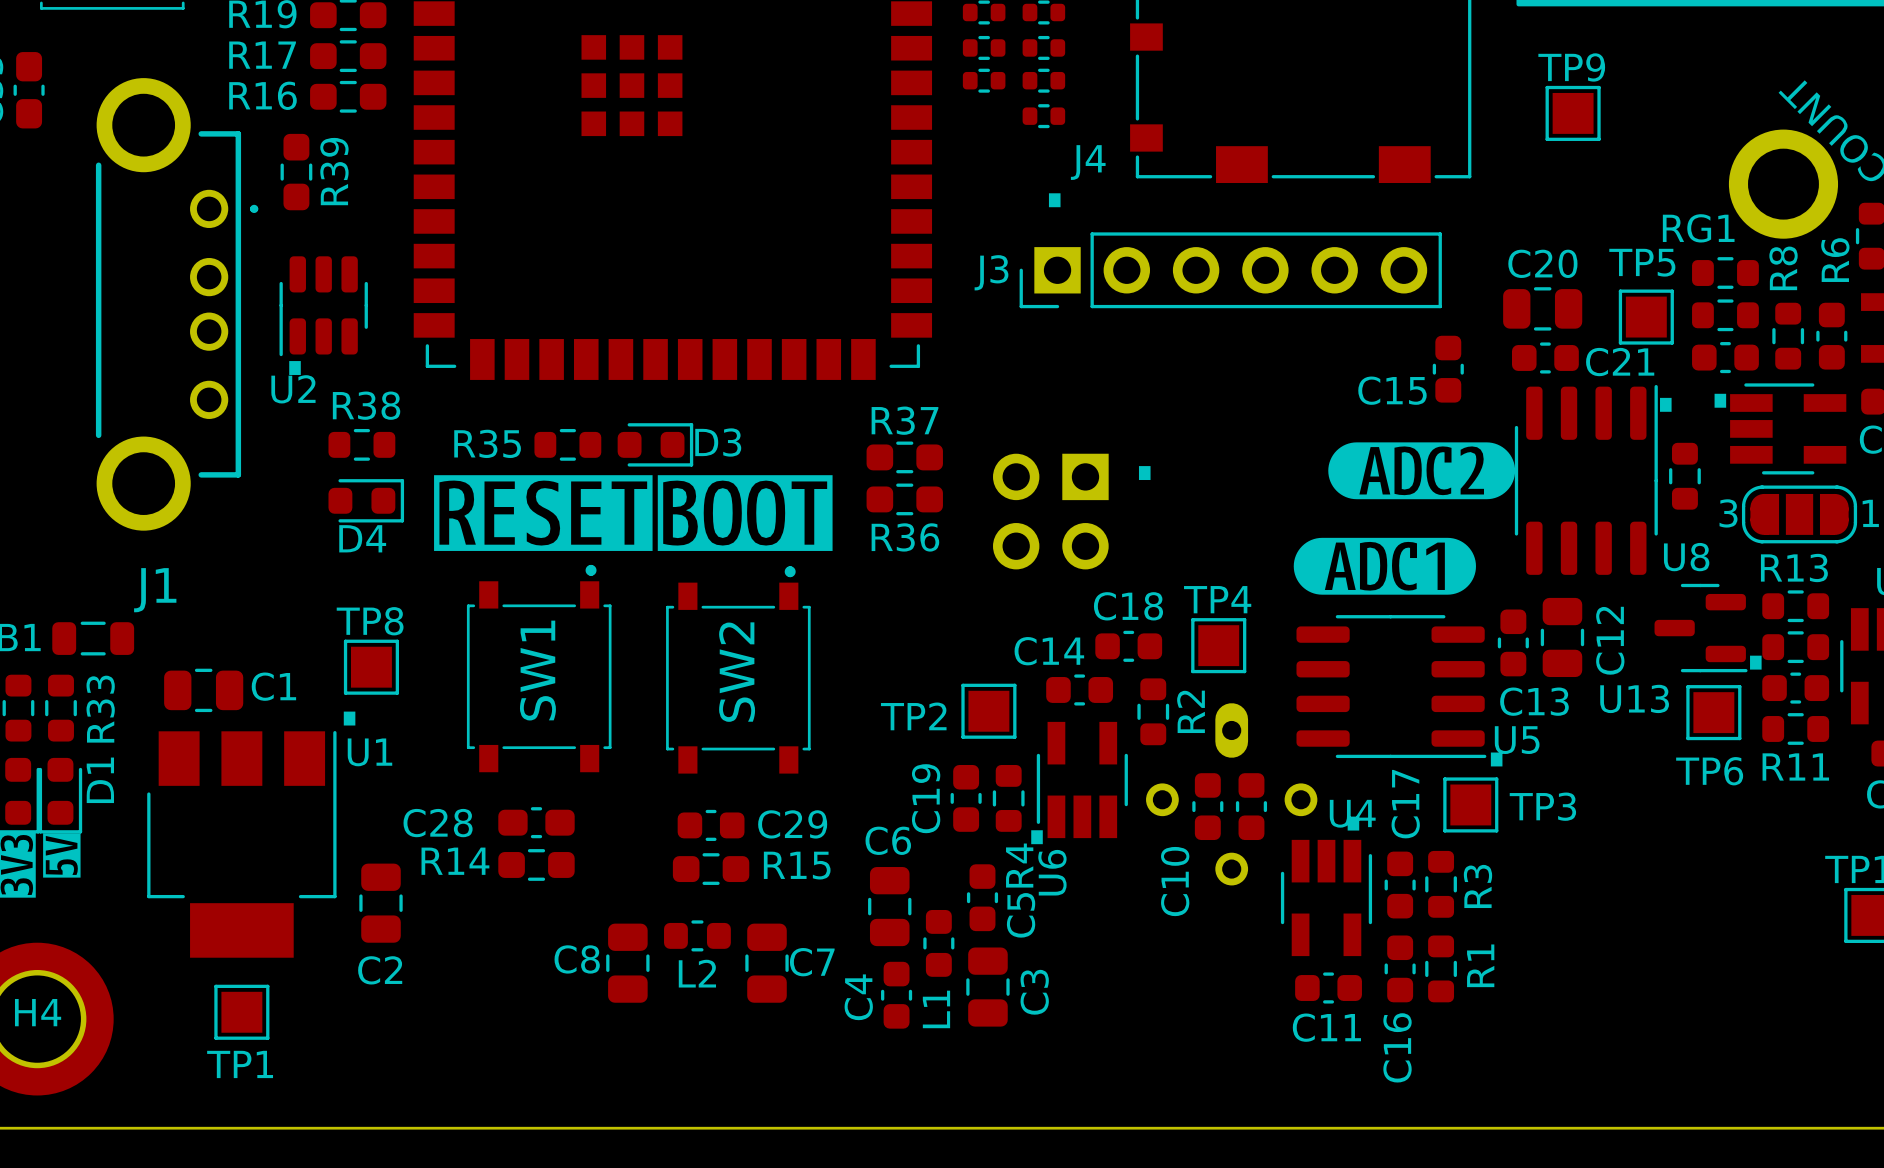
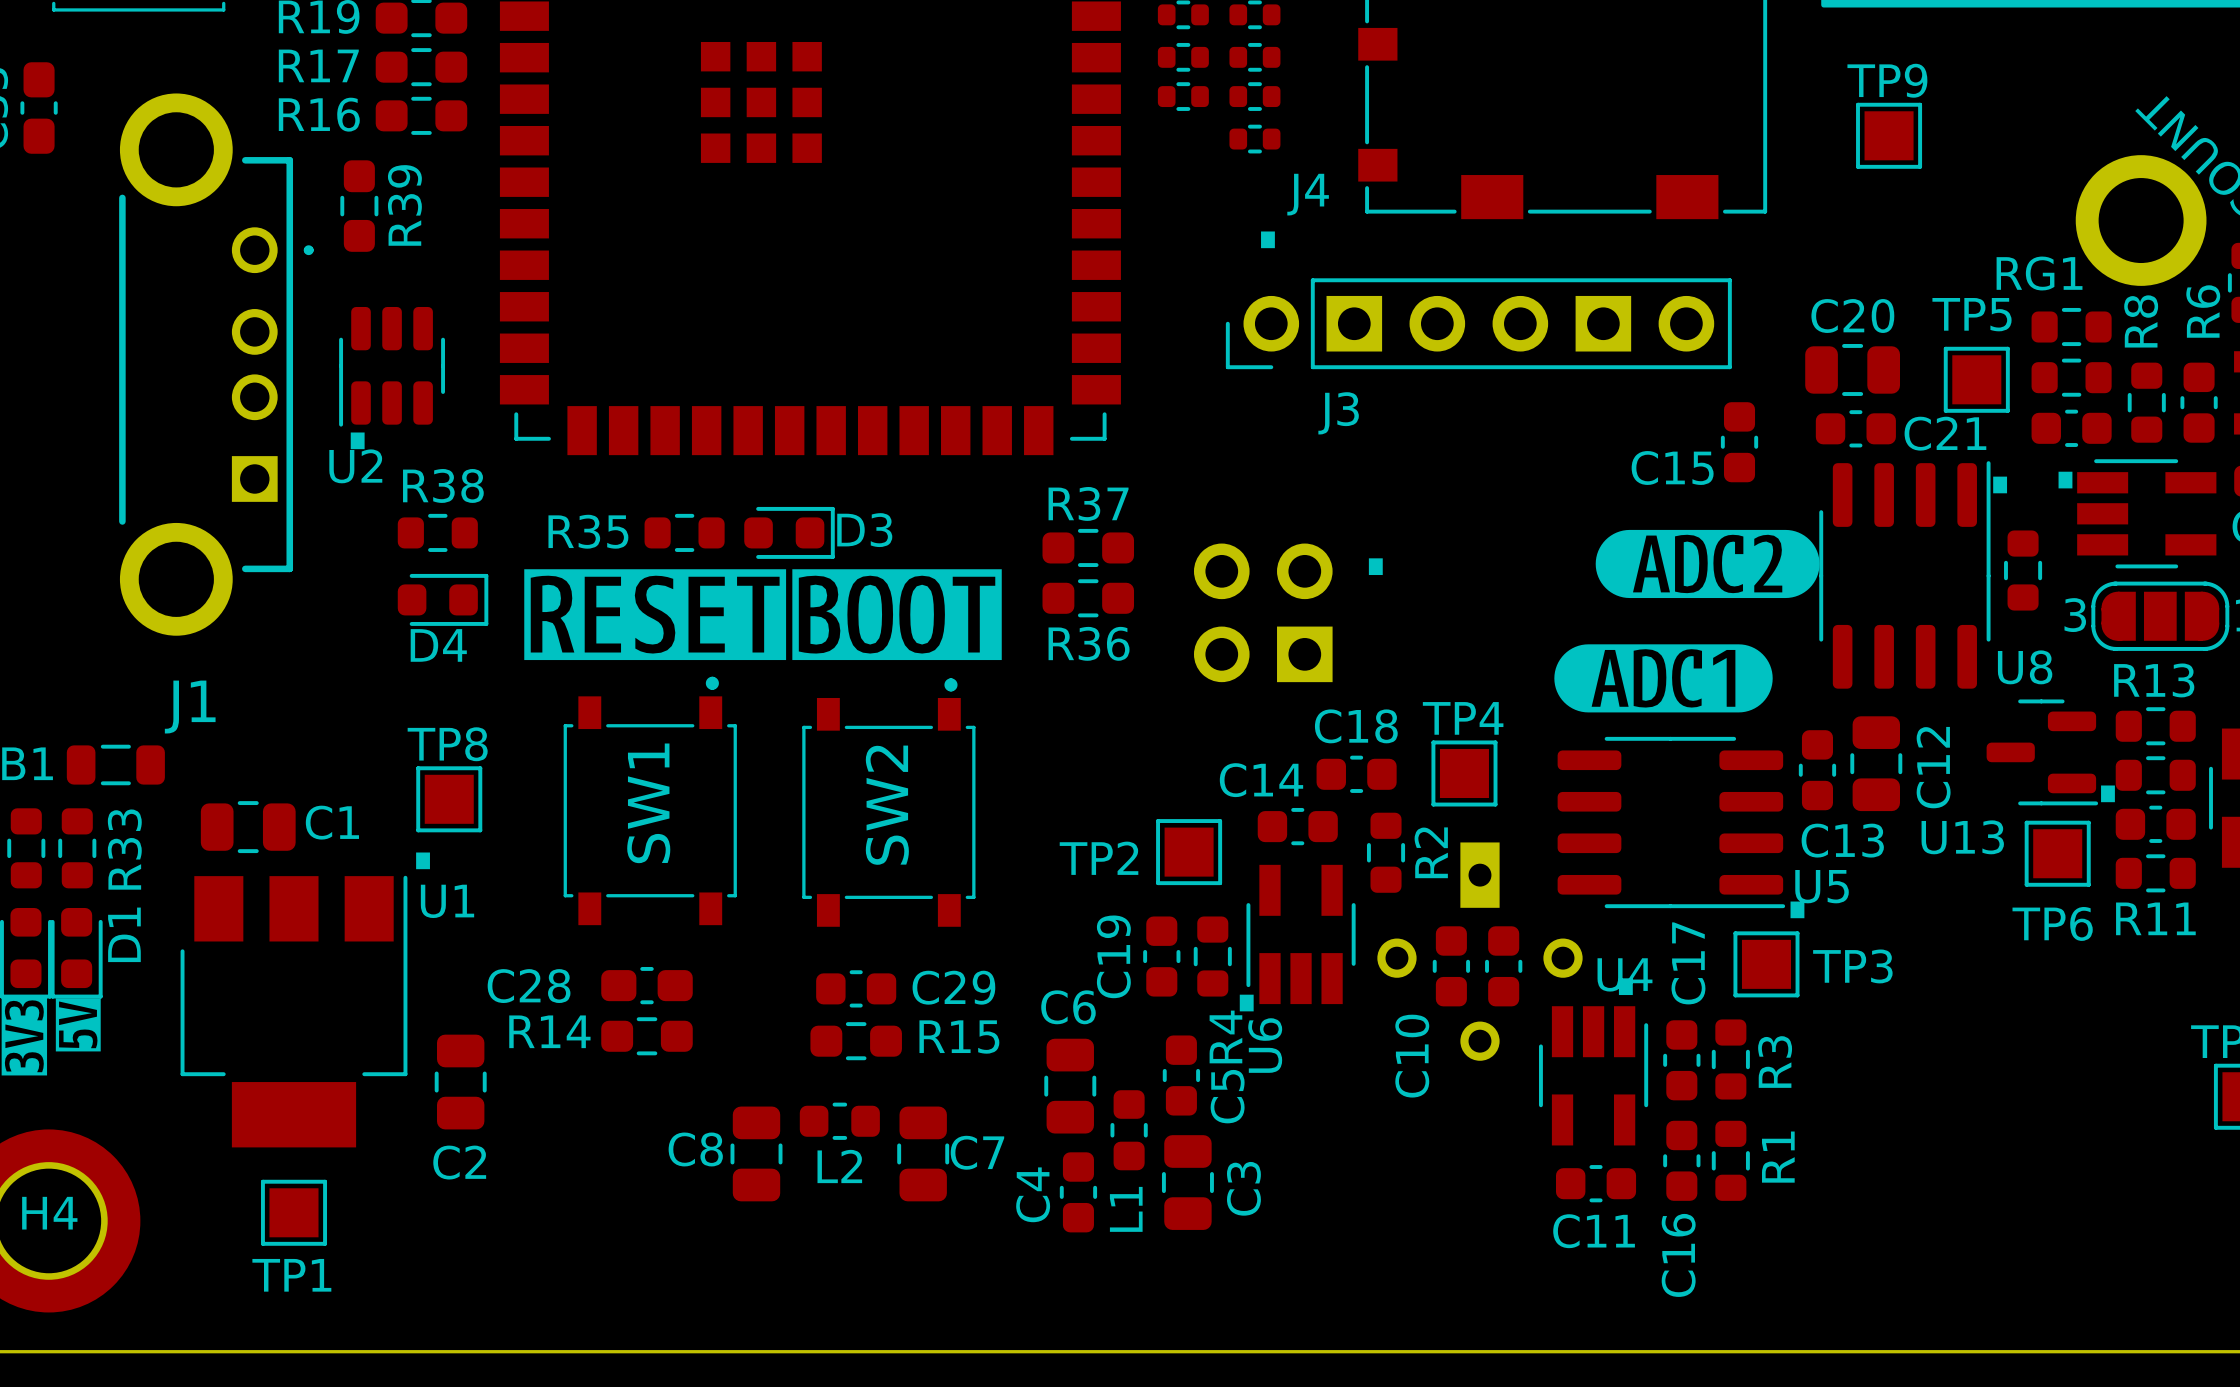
J1 footprint: [95, 78, 259, 531] -> [119, 93, 314, 636]
J3 footprint: [1019, 232, 1442, 309] -> [1225, 278, 1732, 370]
J3 name position: J3 (991, 272) -> J3 (1338, 413)
part rotation: 0° (1050, 511) -> 90° clockwise (1263, 612)
part footprint: [1146, 703, 1318, 886] -> [1377, 842, 1583, 1061]

